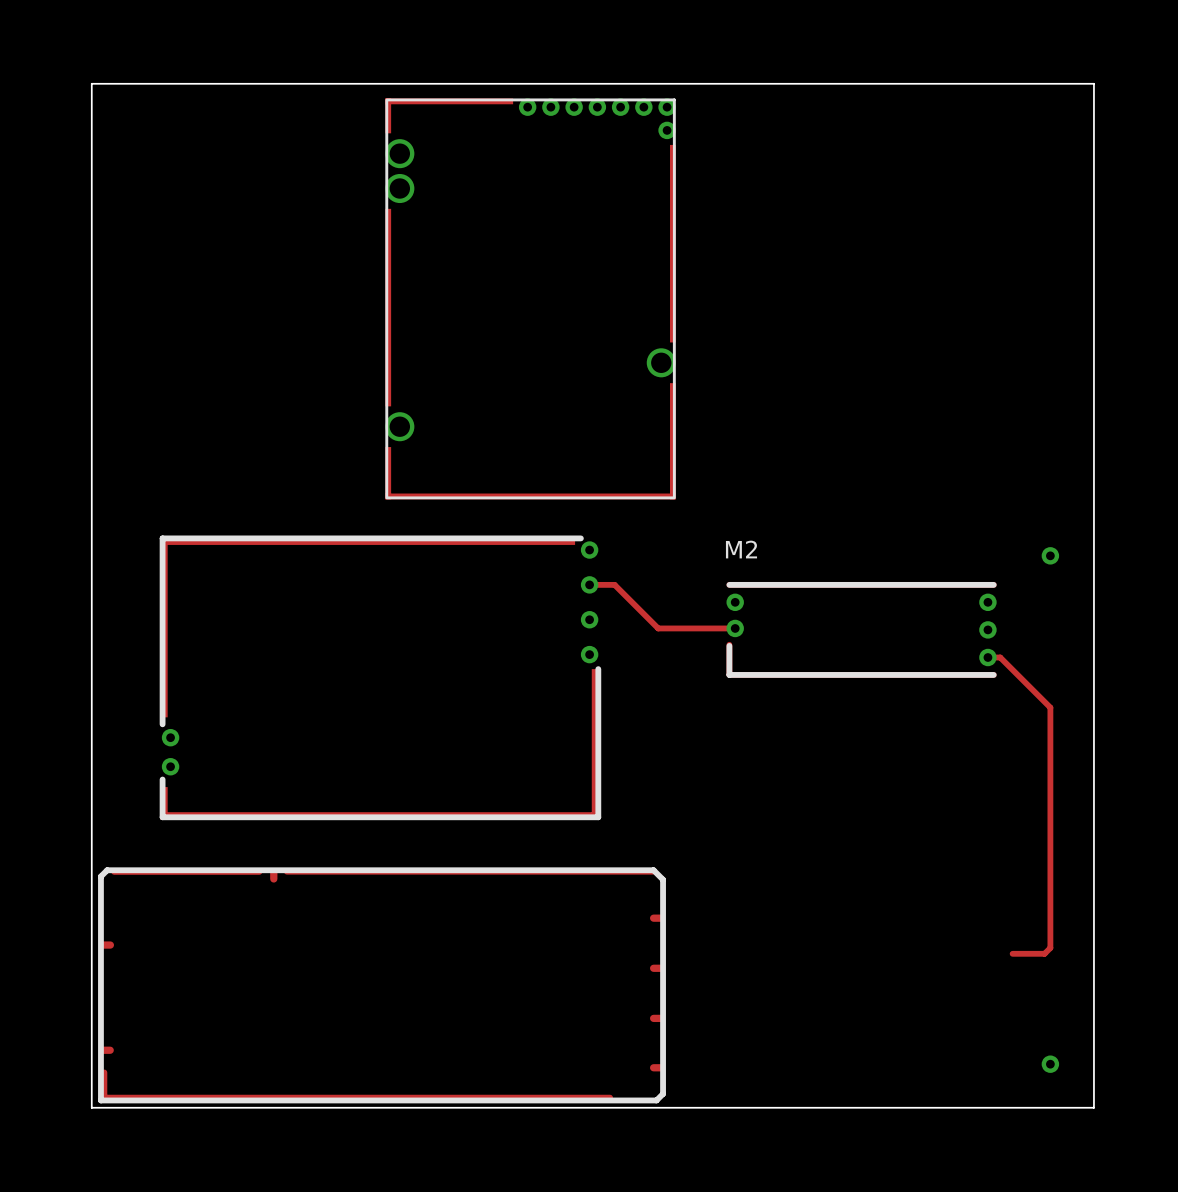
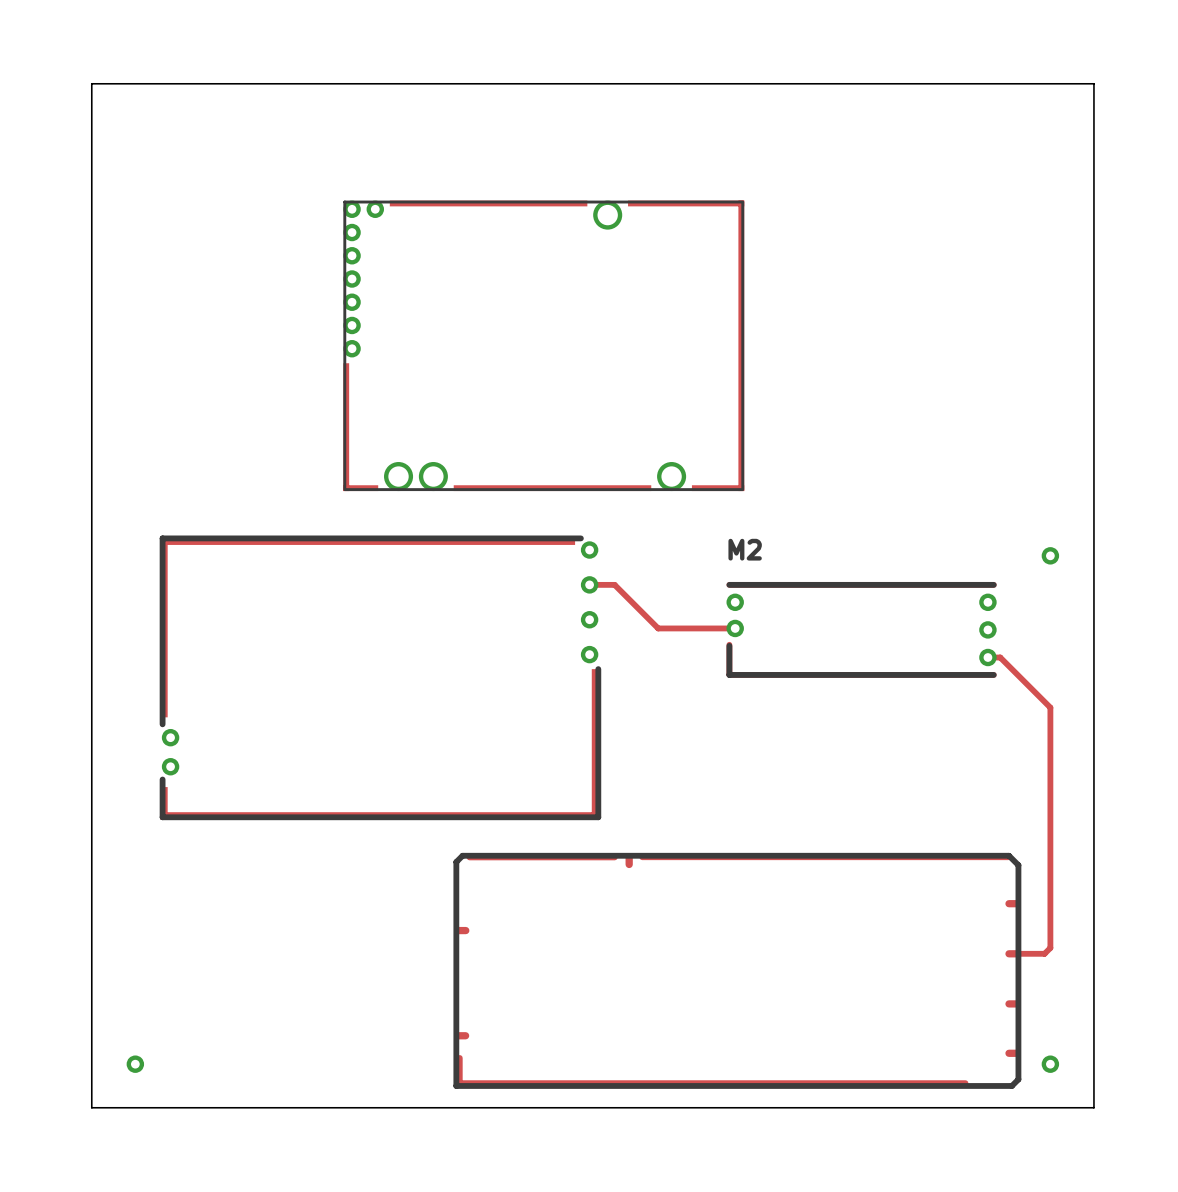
part rotation: 0° (530, 298) -> 90° counterclockwise (543, 345)
part position: (382, 985) -> (737, 970)
via: none -> (135, 1064)

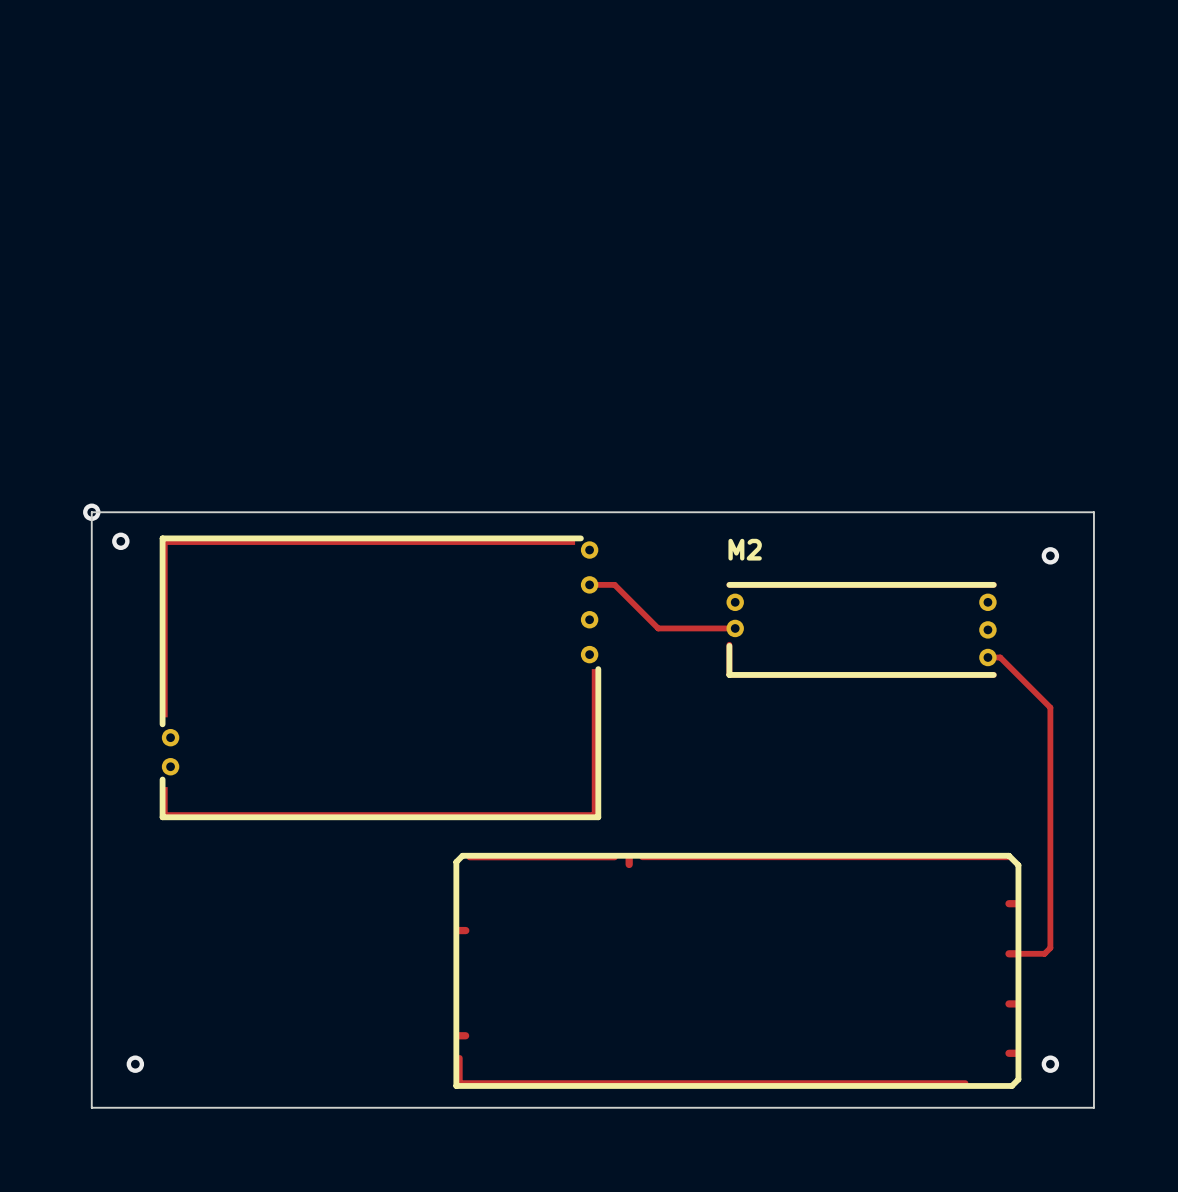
part: (543, 345) -> none
board edge: (91, 512) (91, 83) (1093, 83) (1093, 512) -> (91, 512) (1093, 512)
via: none -> (91, 512)
via: none -> (120, 541)

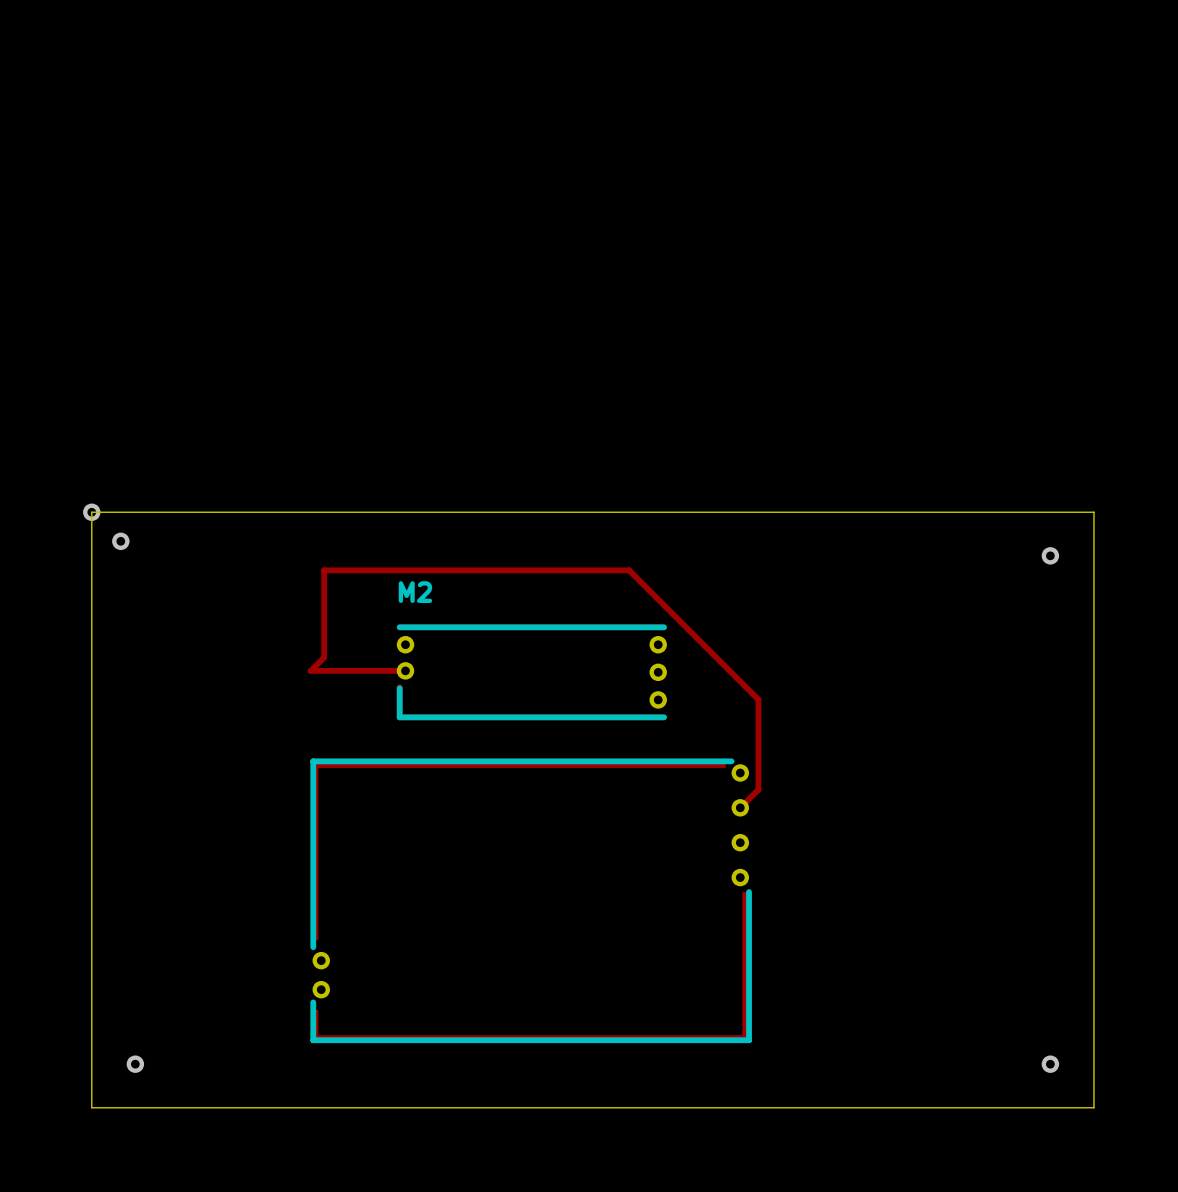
track: (589, 584) (614, 584) (658, 628) (735, 628) -> none
M2 position: (861, 629) -> (531, 672)
track: (987, 657) (1000, 657) (1050, 707) (1050, 947) (1044, 953) (1012, 953) -> none
track: none -> (405, 670) (310, 670) (324, 657) (324, 570) (629, 570) (758, 699) (758, 789) (740, 807)
part position: (380, 677) -> (531, 900)
part: (737, 970) -> none

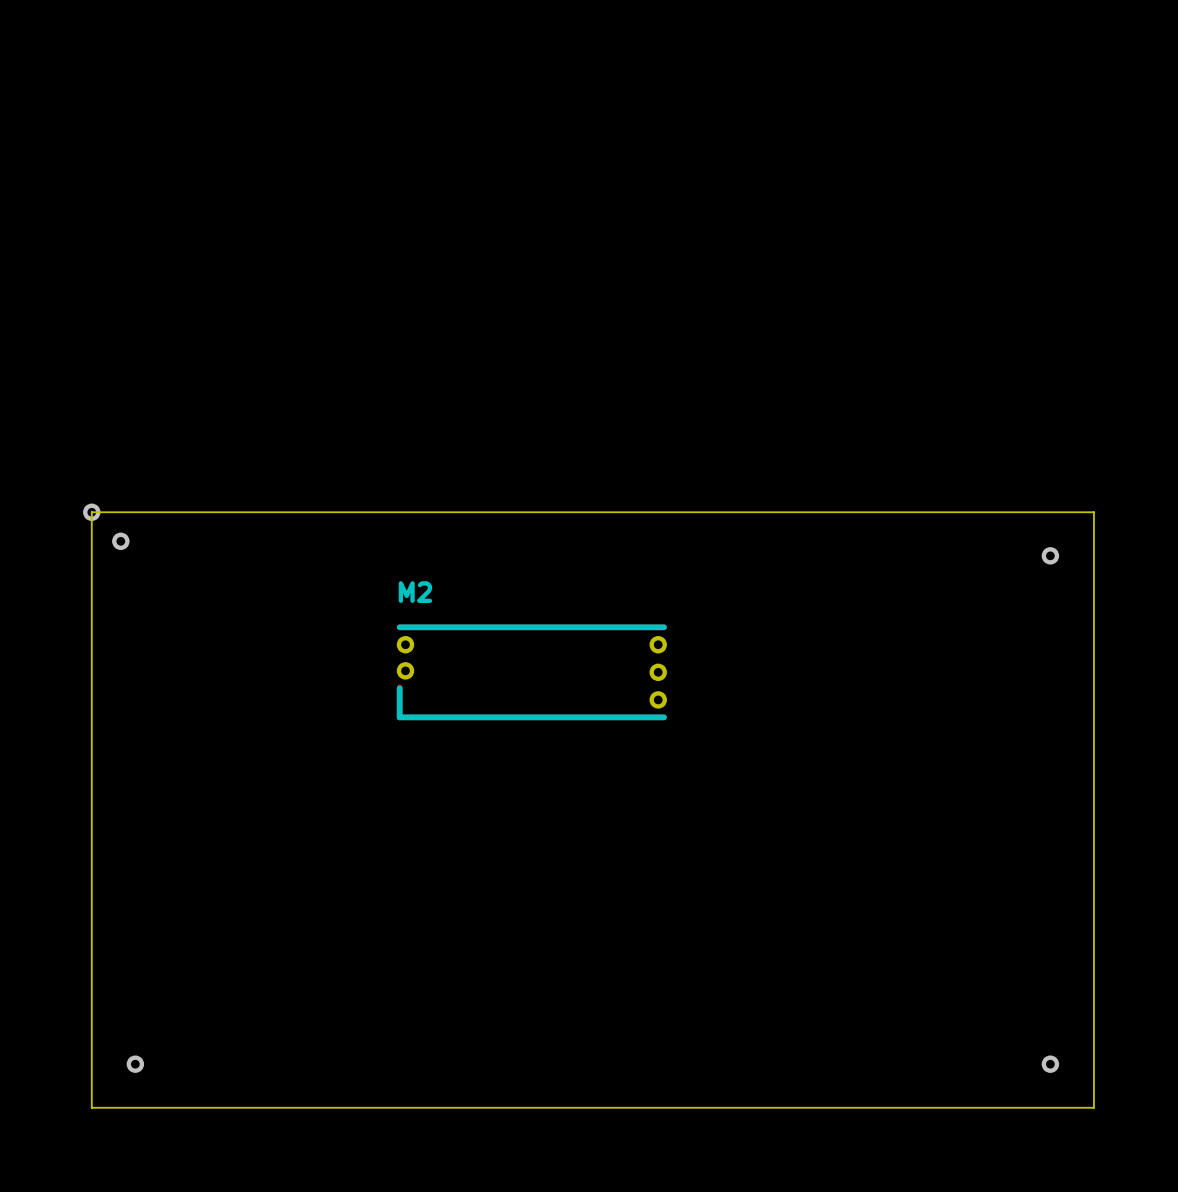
track: (405, 670) (310, 670) (324, 657) (324, 570) (629, 570) (758, 699) (758, 789) (740, 807) -> none
part: (531, 900) -> none

